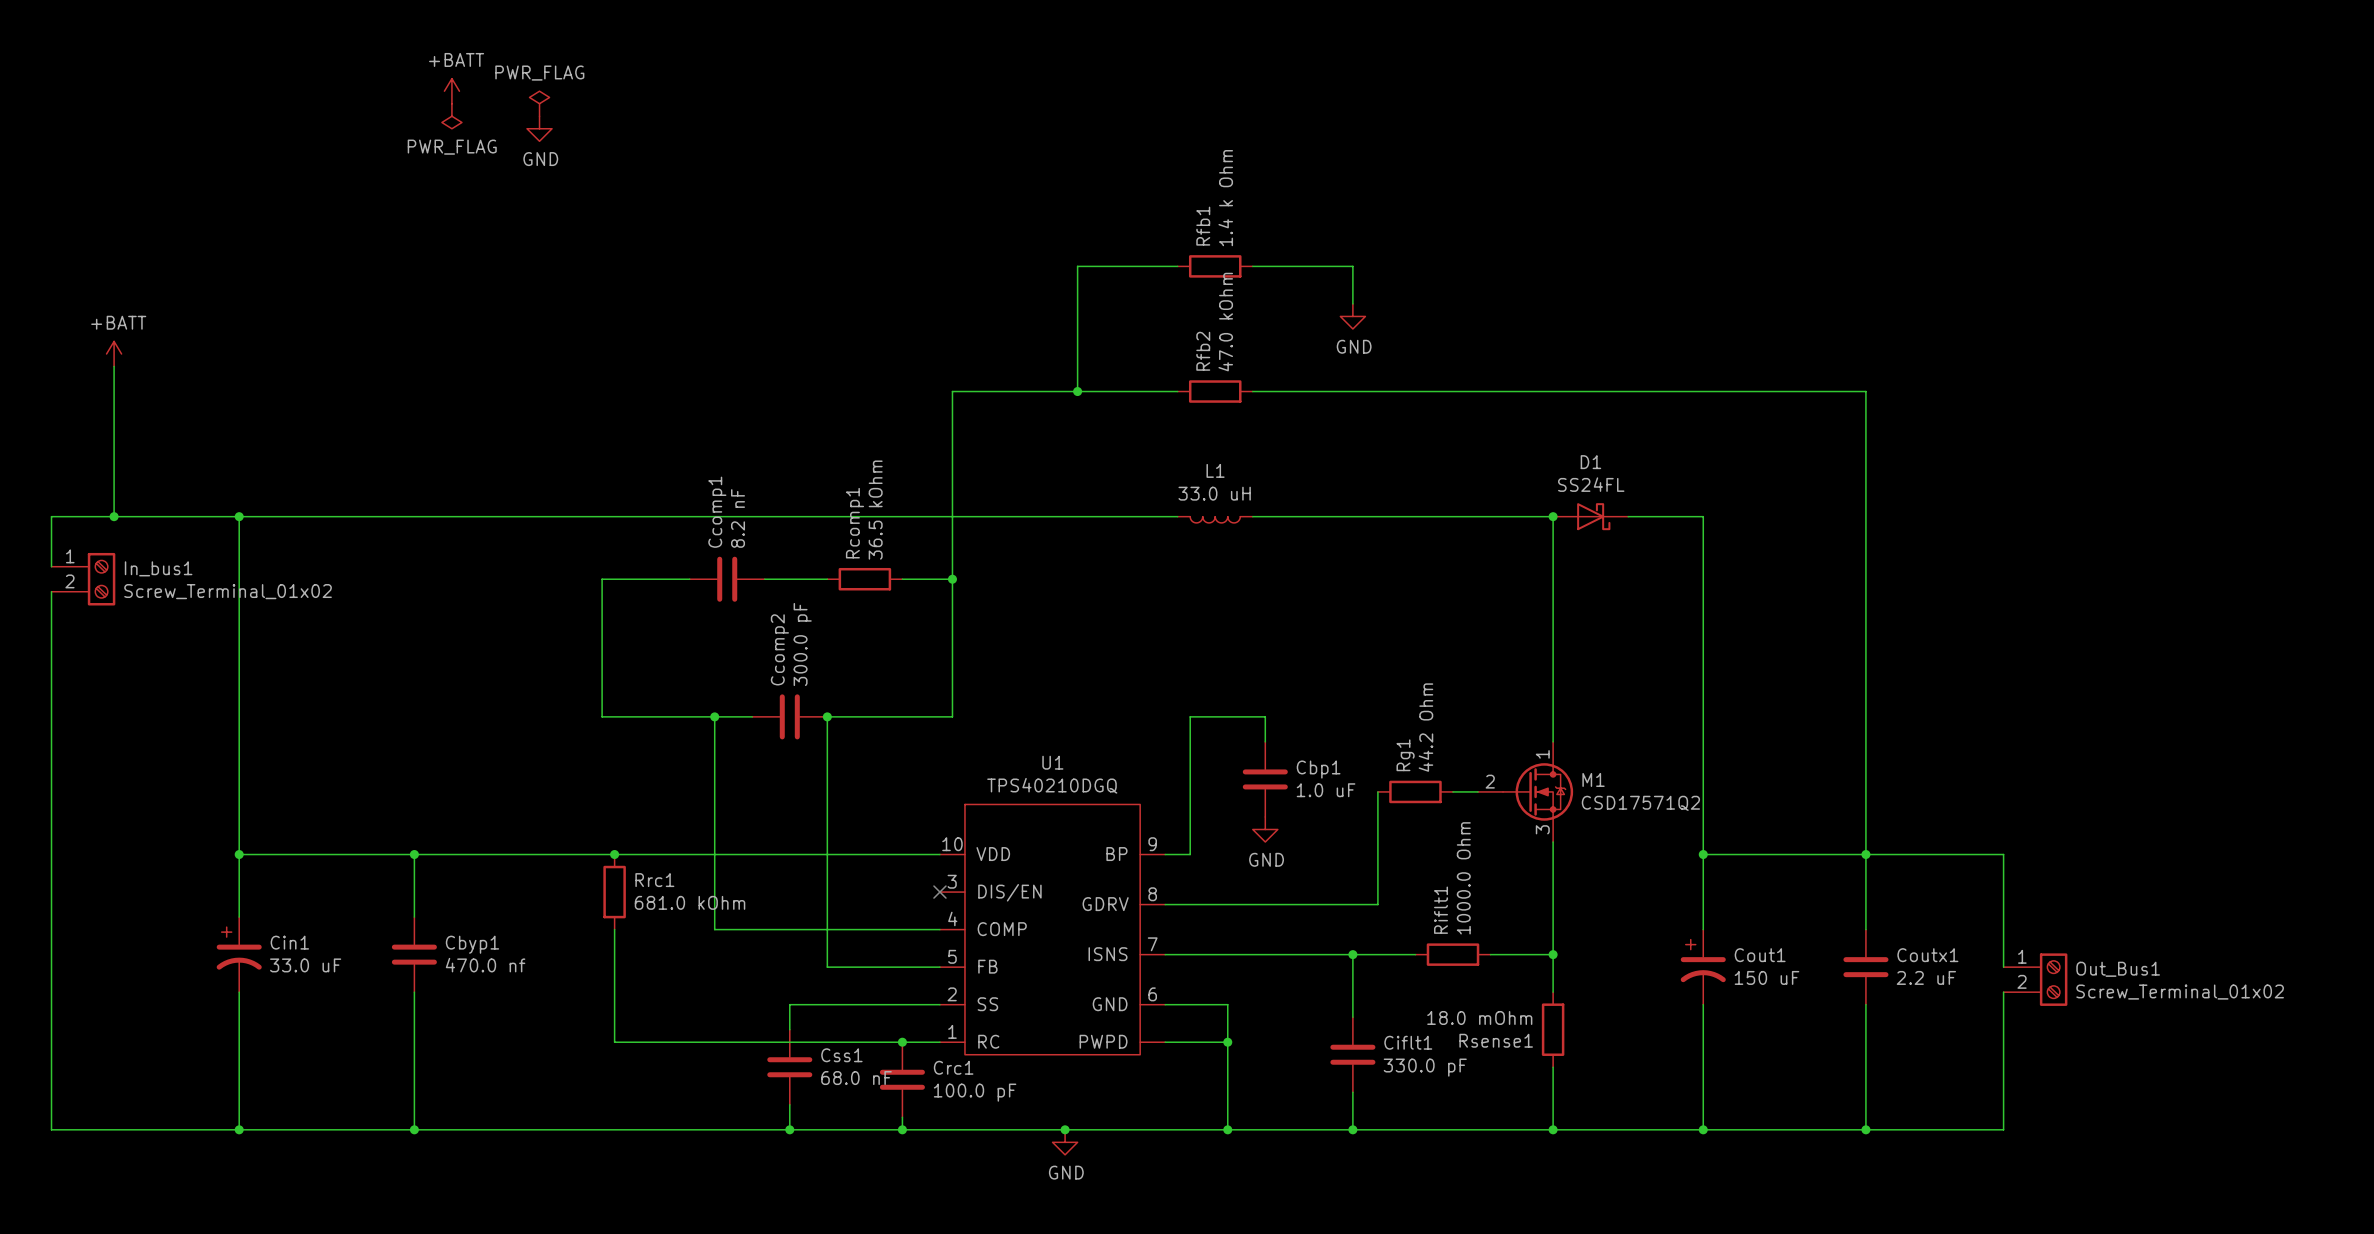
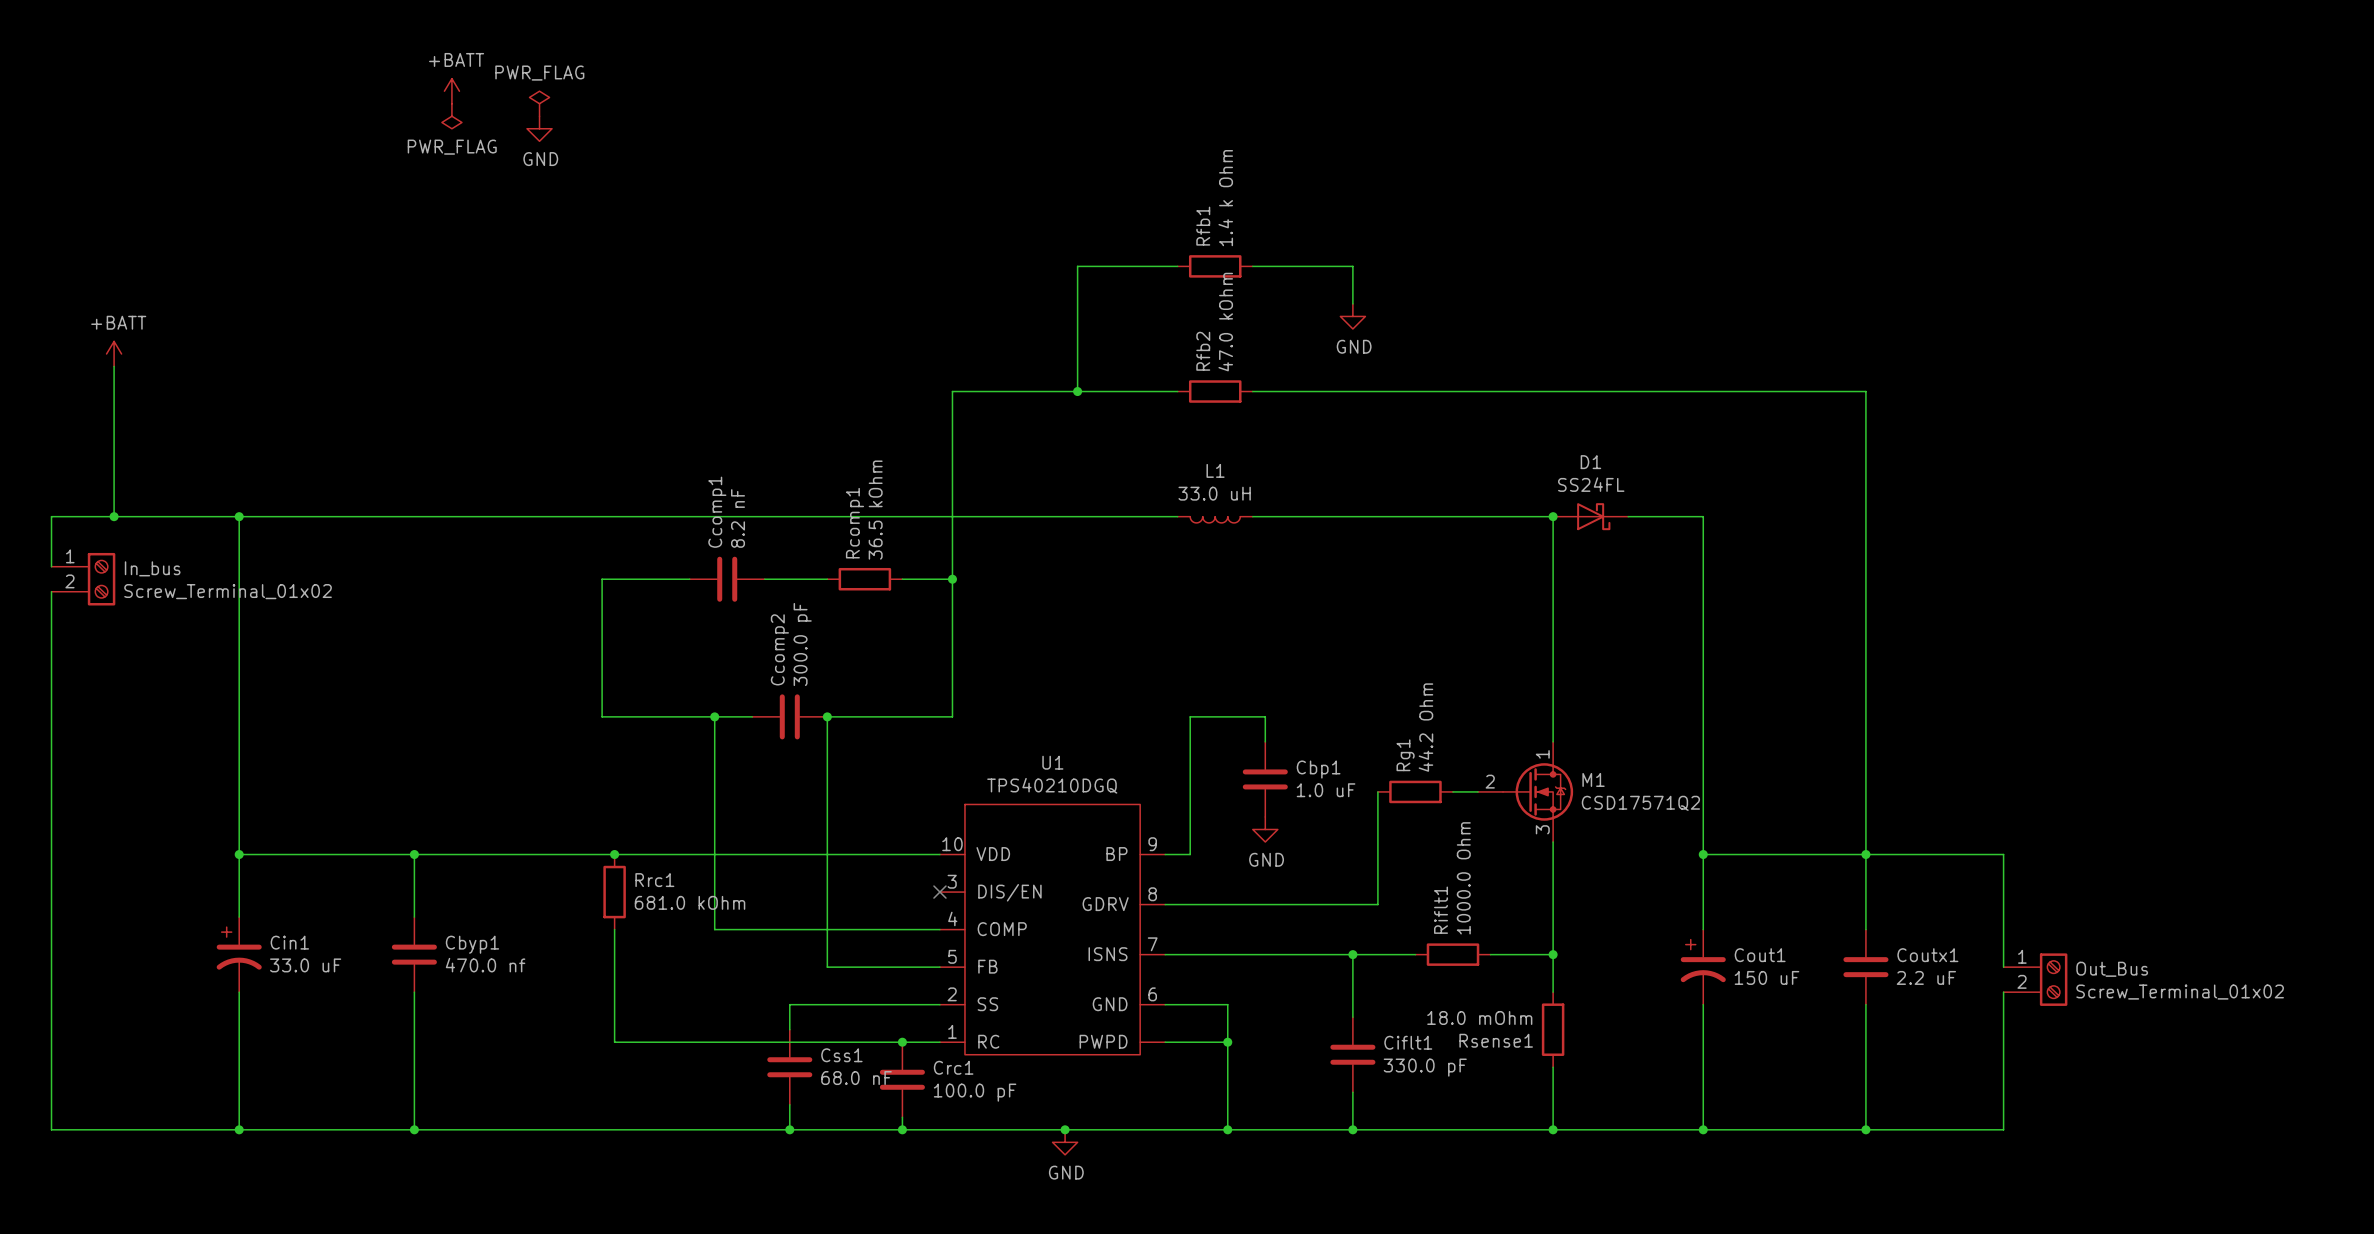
In_bus1 name: In_bus1 (158, 568) -> In_bus (152, 568)
Out_Bus1 name: Out_Bus1 (2118, 969) -> Out_Bus (2112, 969)

